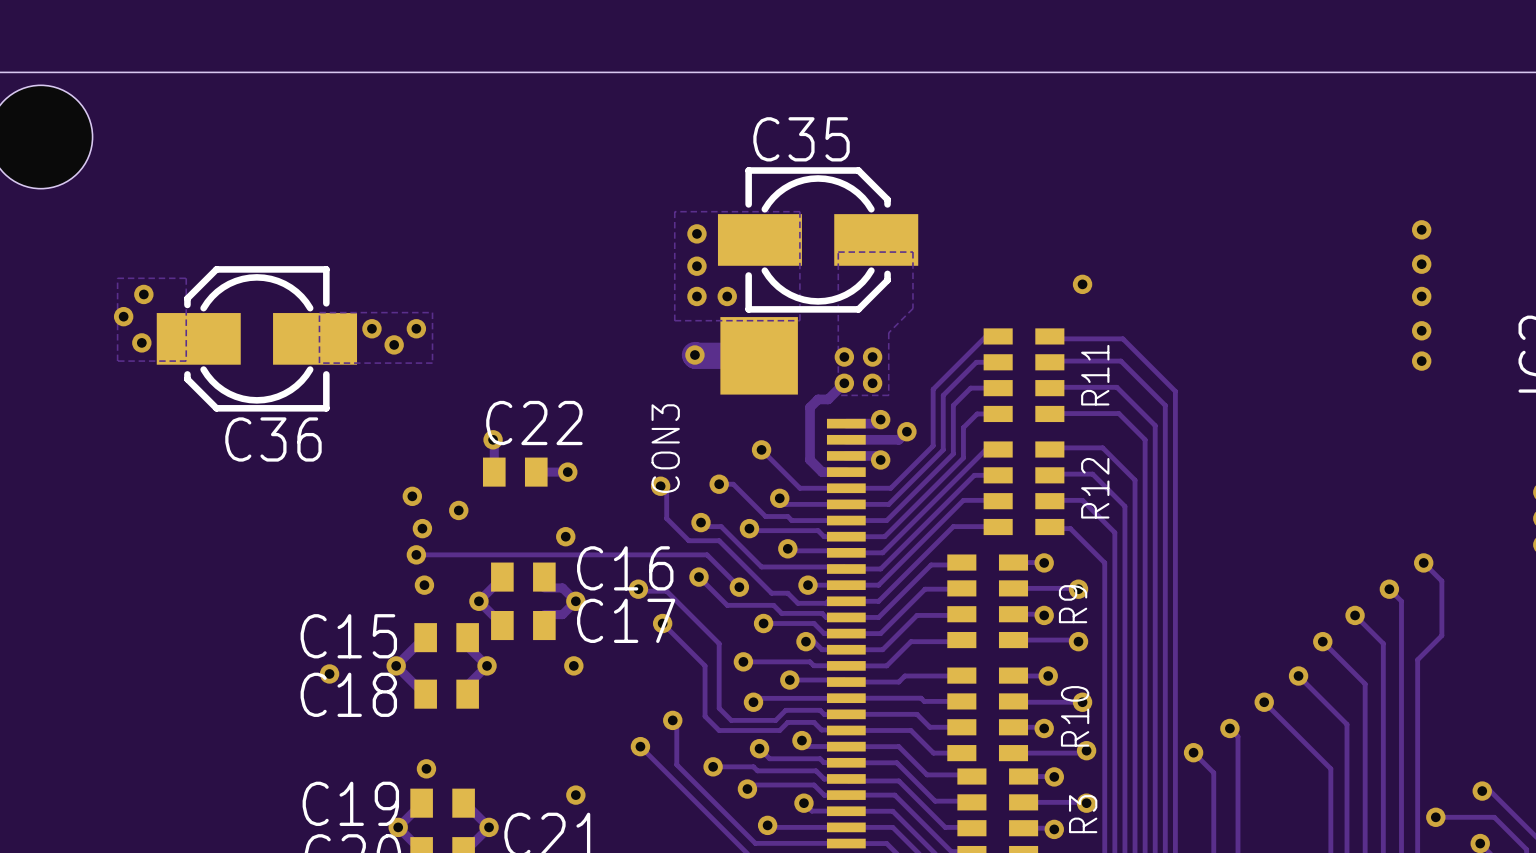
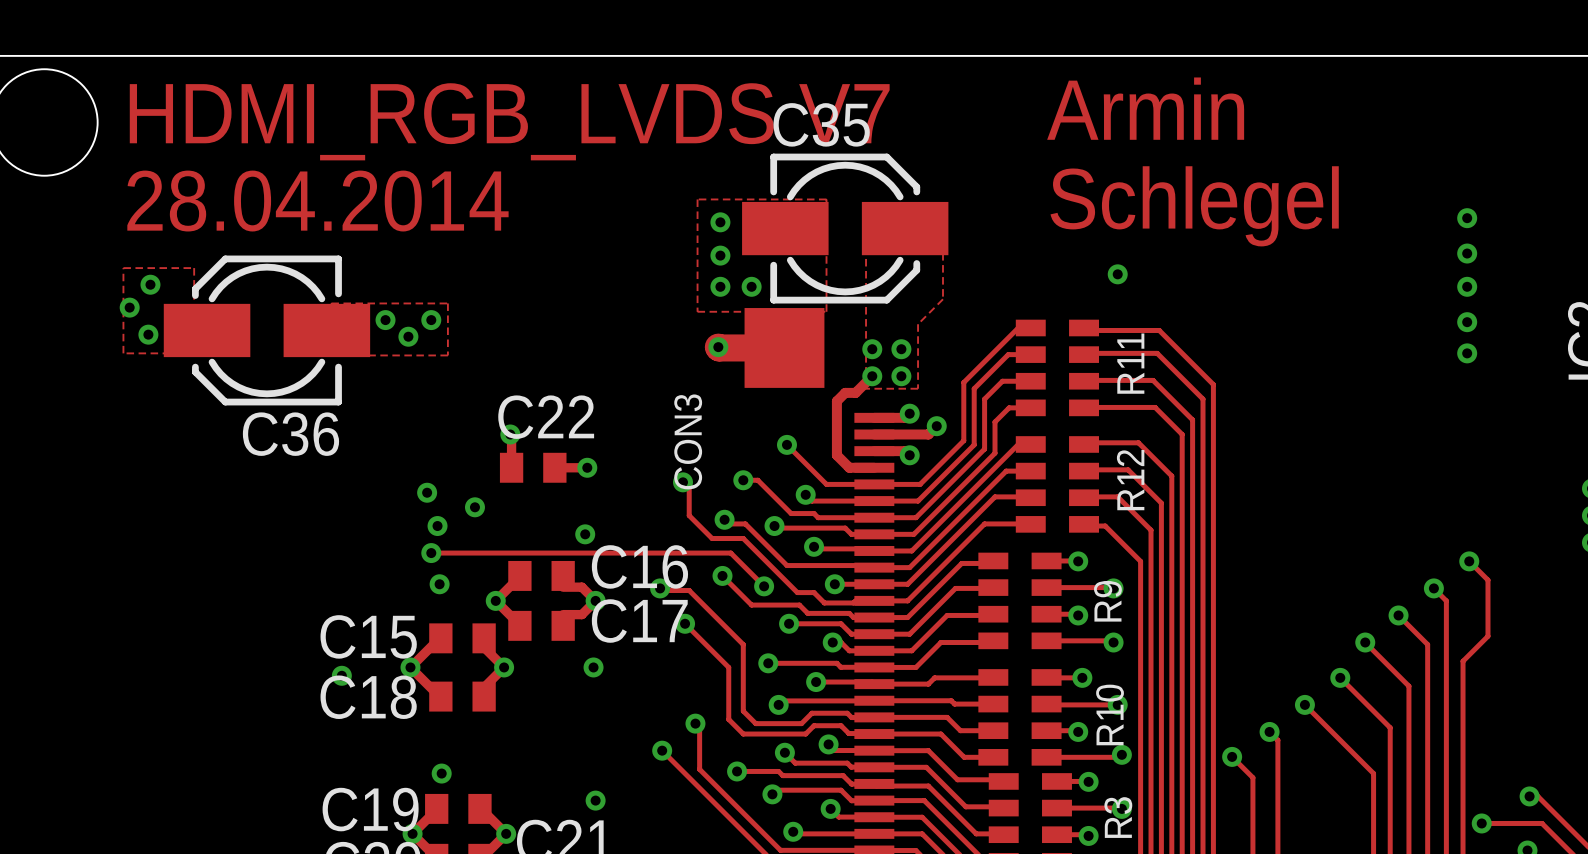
text: none -> Armin (1145, 108)
text: none -> HDMI_RGB_LVDS V7 (509, 121)
text: none -> 28.04.2014 (317, 201)
text: none -> Schlegel (1194, 206)

